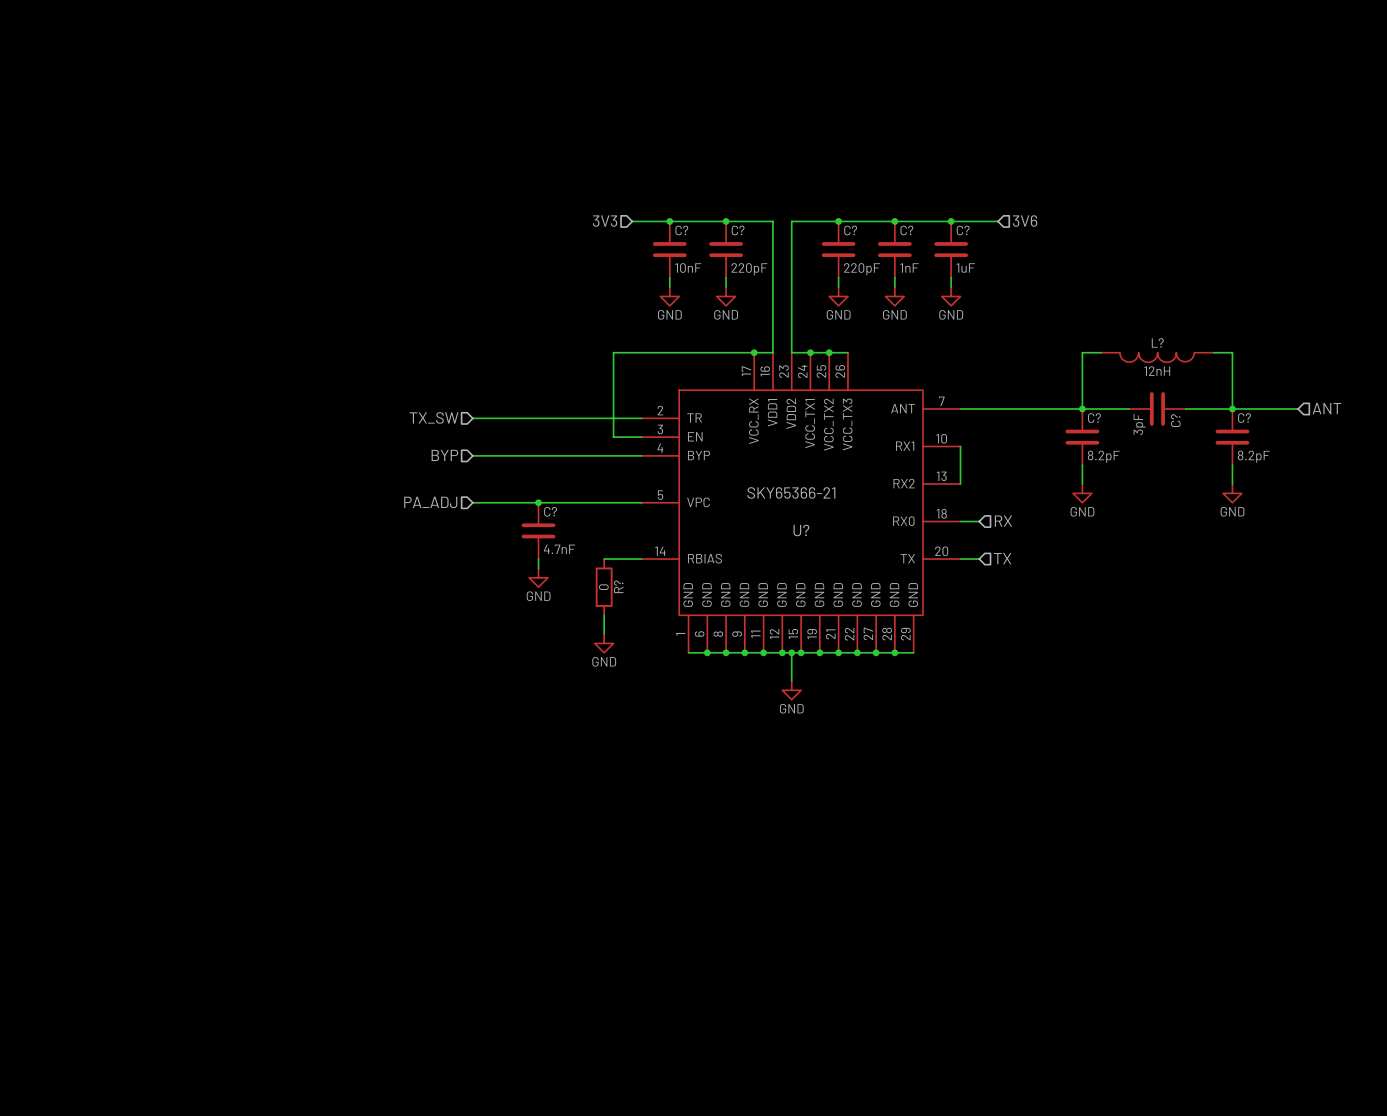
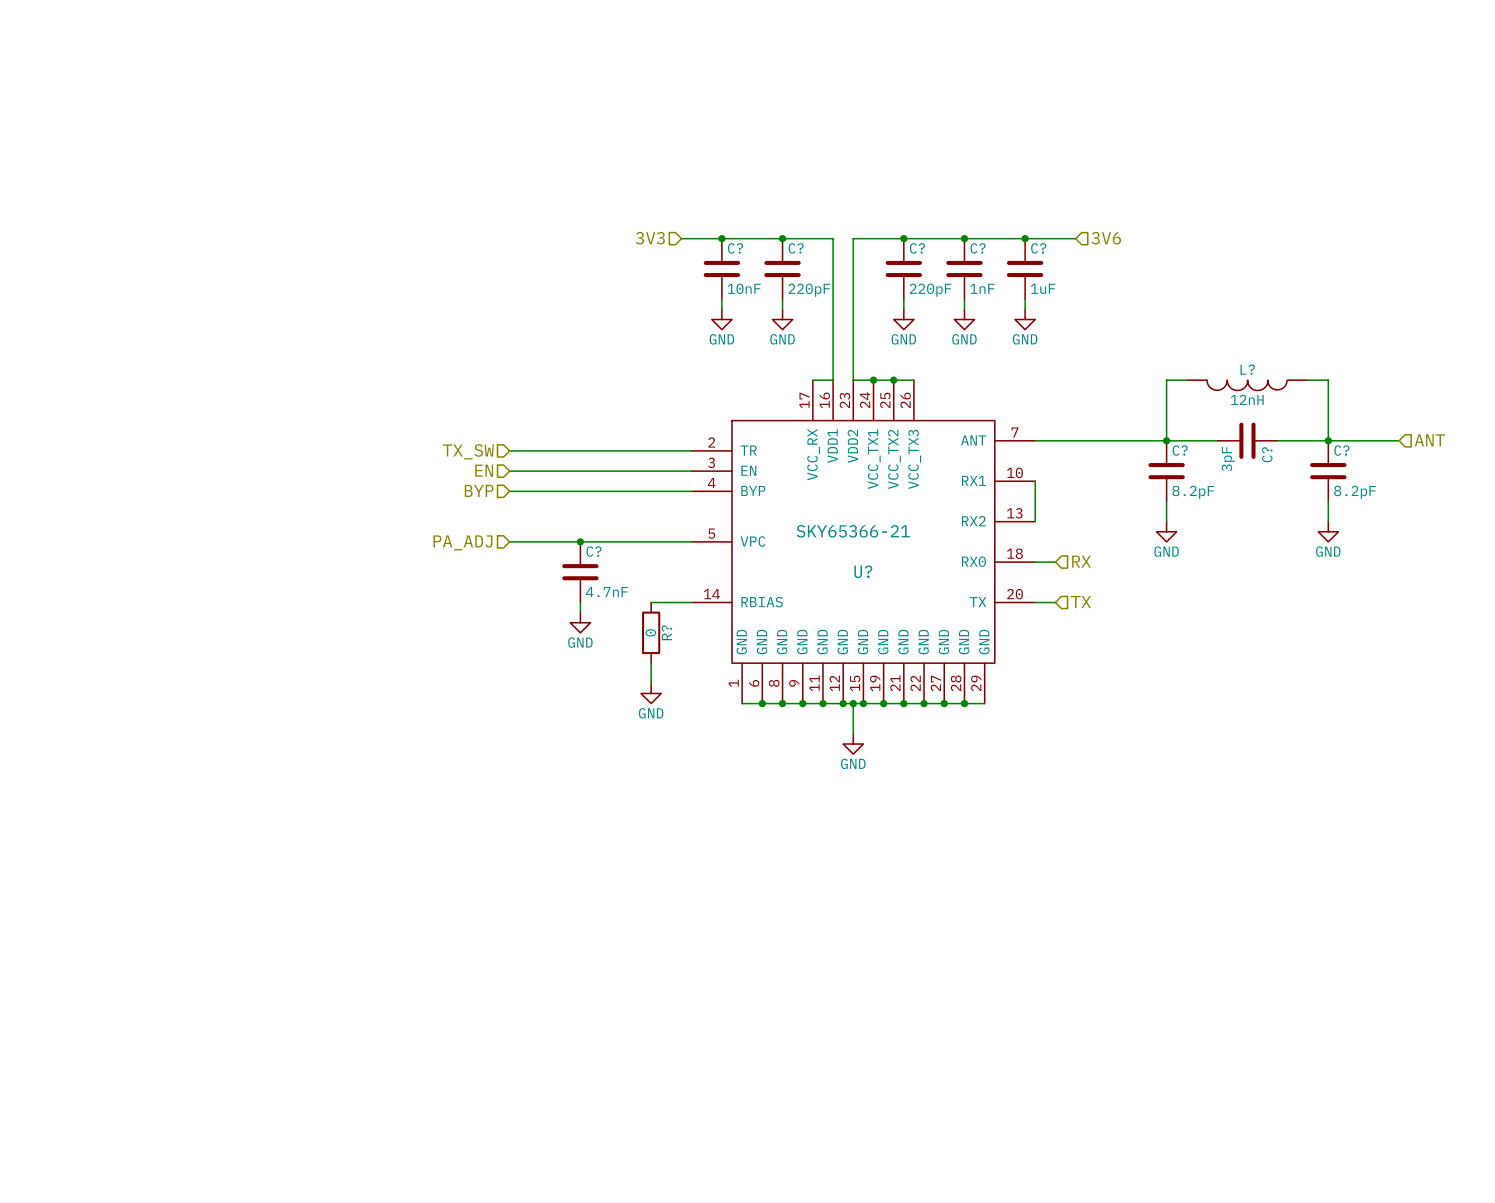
wire: (754, 352) (613, 352) (613, 437) -> (509, 471) (661, 471)
junction: (754, 352) -> none
hierarchical label: none -> EN (484, 470)

